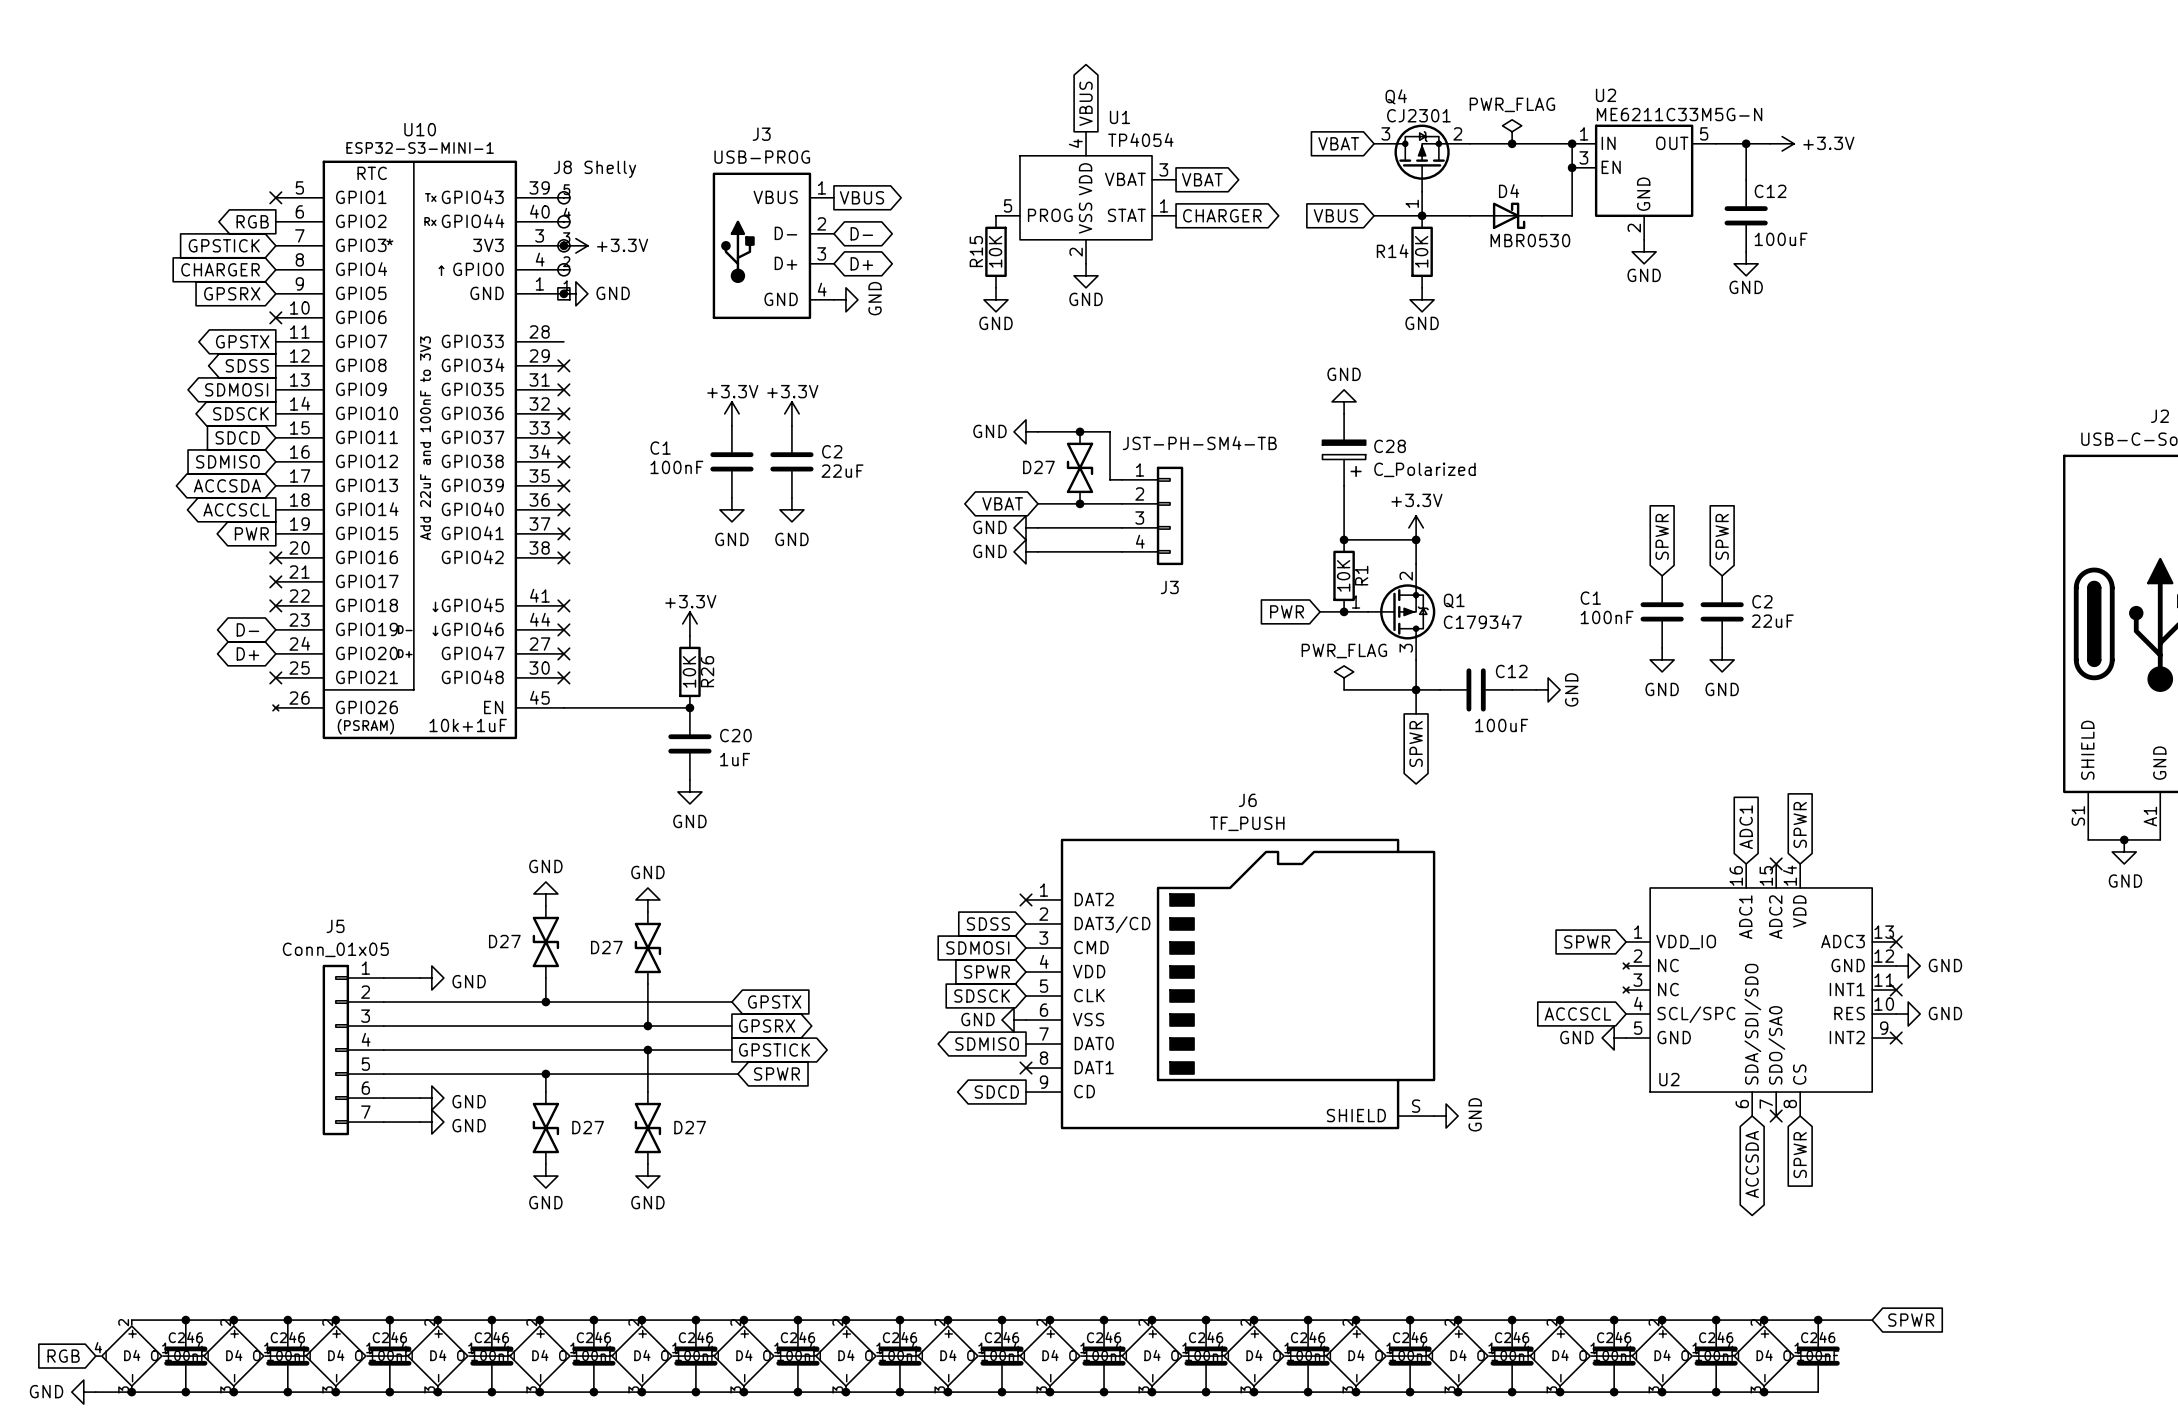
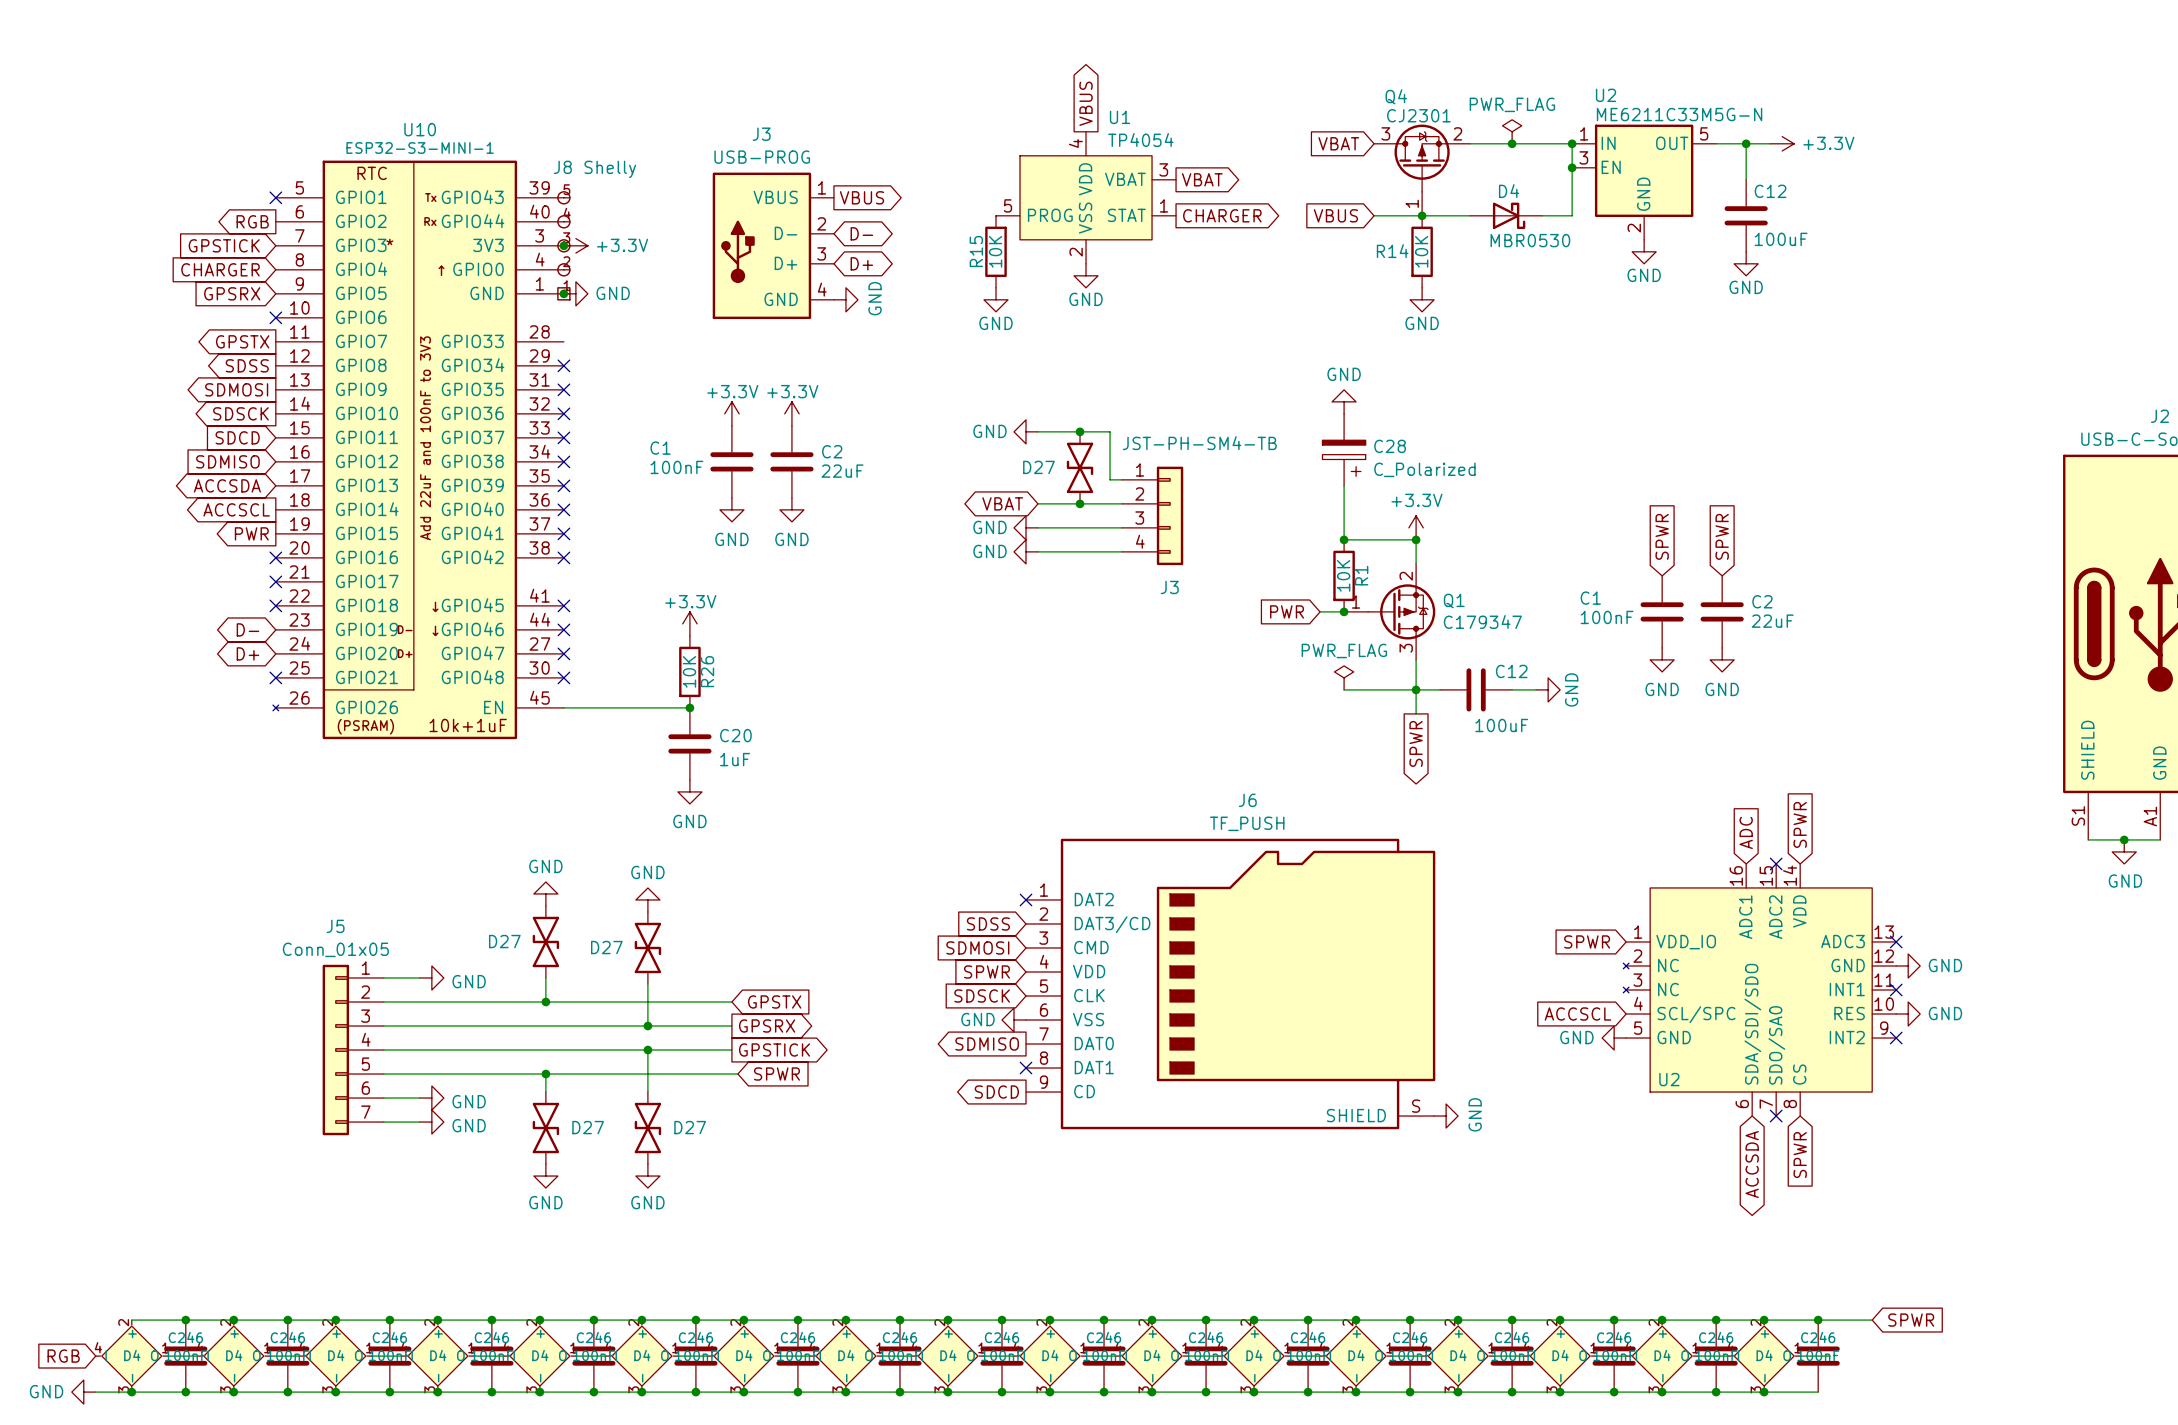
global label: ADC1 (1746, 827) -> ADC (1746, 832)

